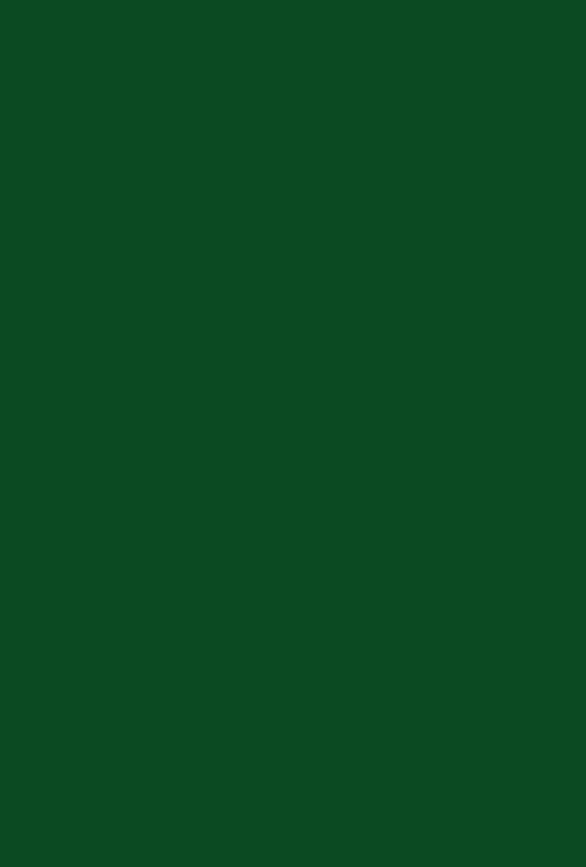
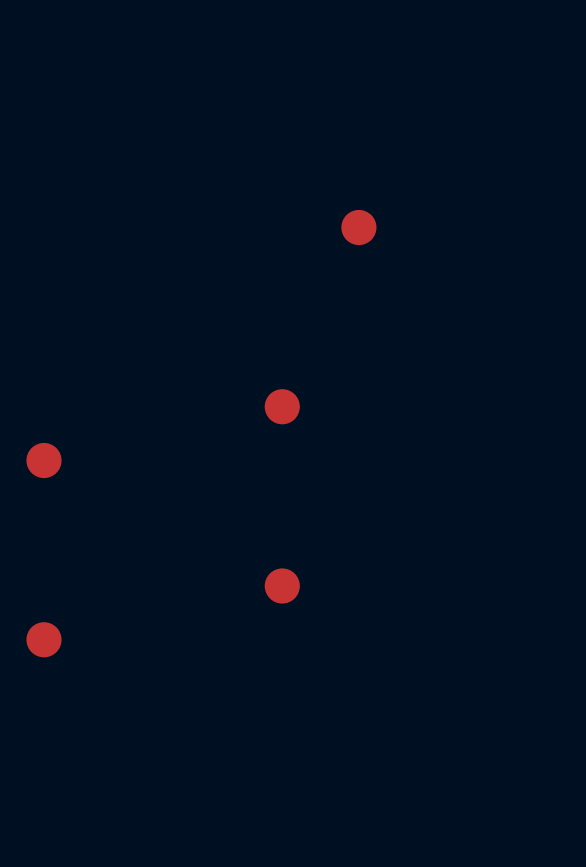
part: none -> (358, 227)
part: none -> (282, 406)
part: none -> (43, 460)
part: none -> (282, 585)
part: none -> (43, 639)

